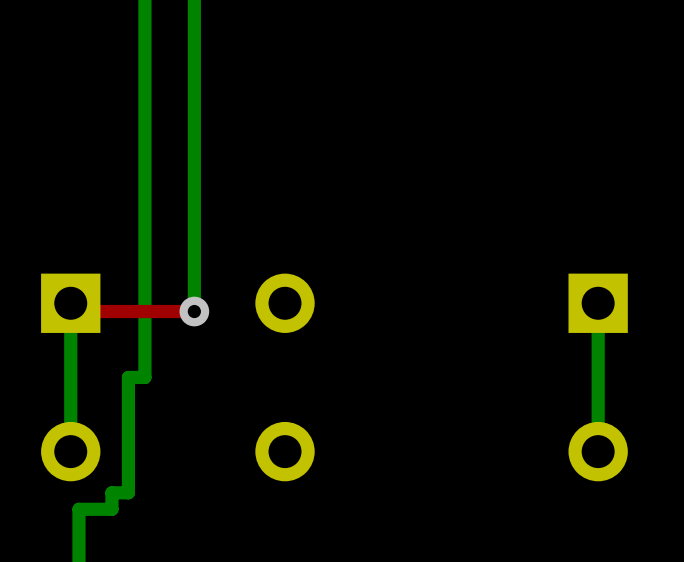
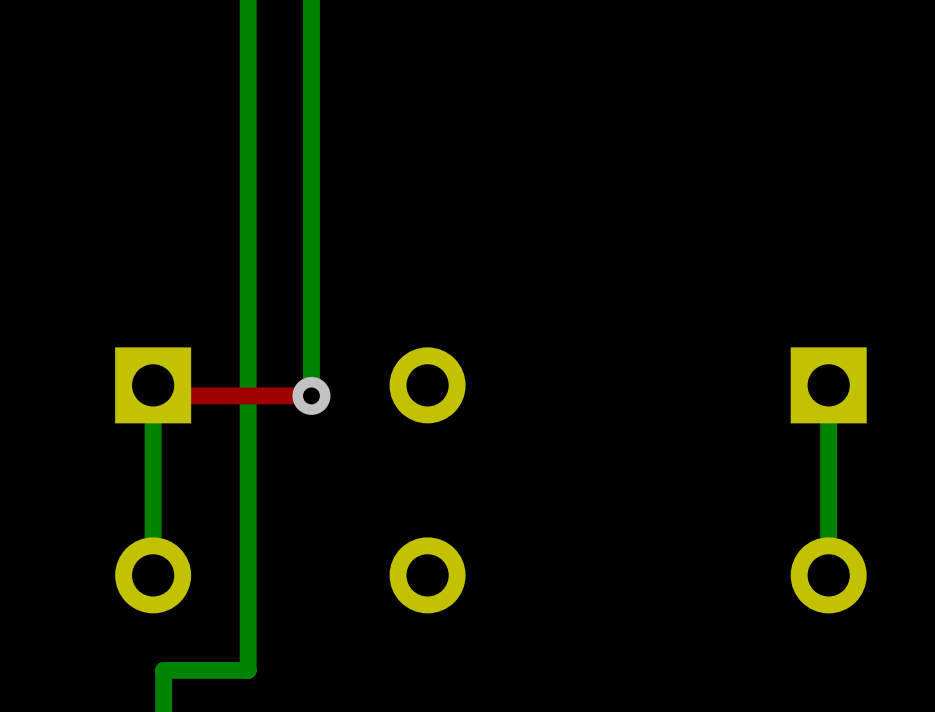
bottom track: (144, 377) (128, 377) (128, 492) (111, 492) (111, 509) (78, 509) (78, 525) -> (248, 480) (248, 670) (163, 670)

